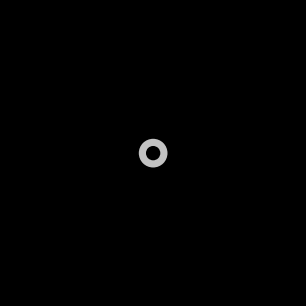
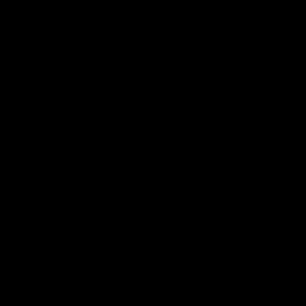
via: (153, 153) -> none

